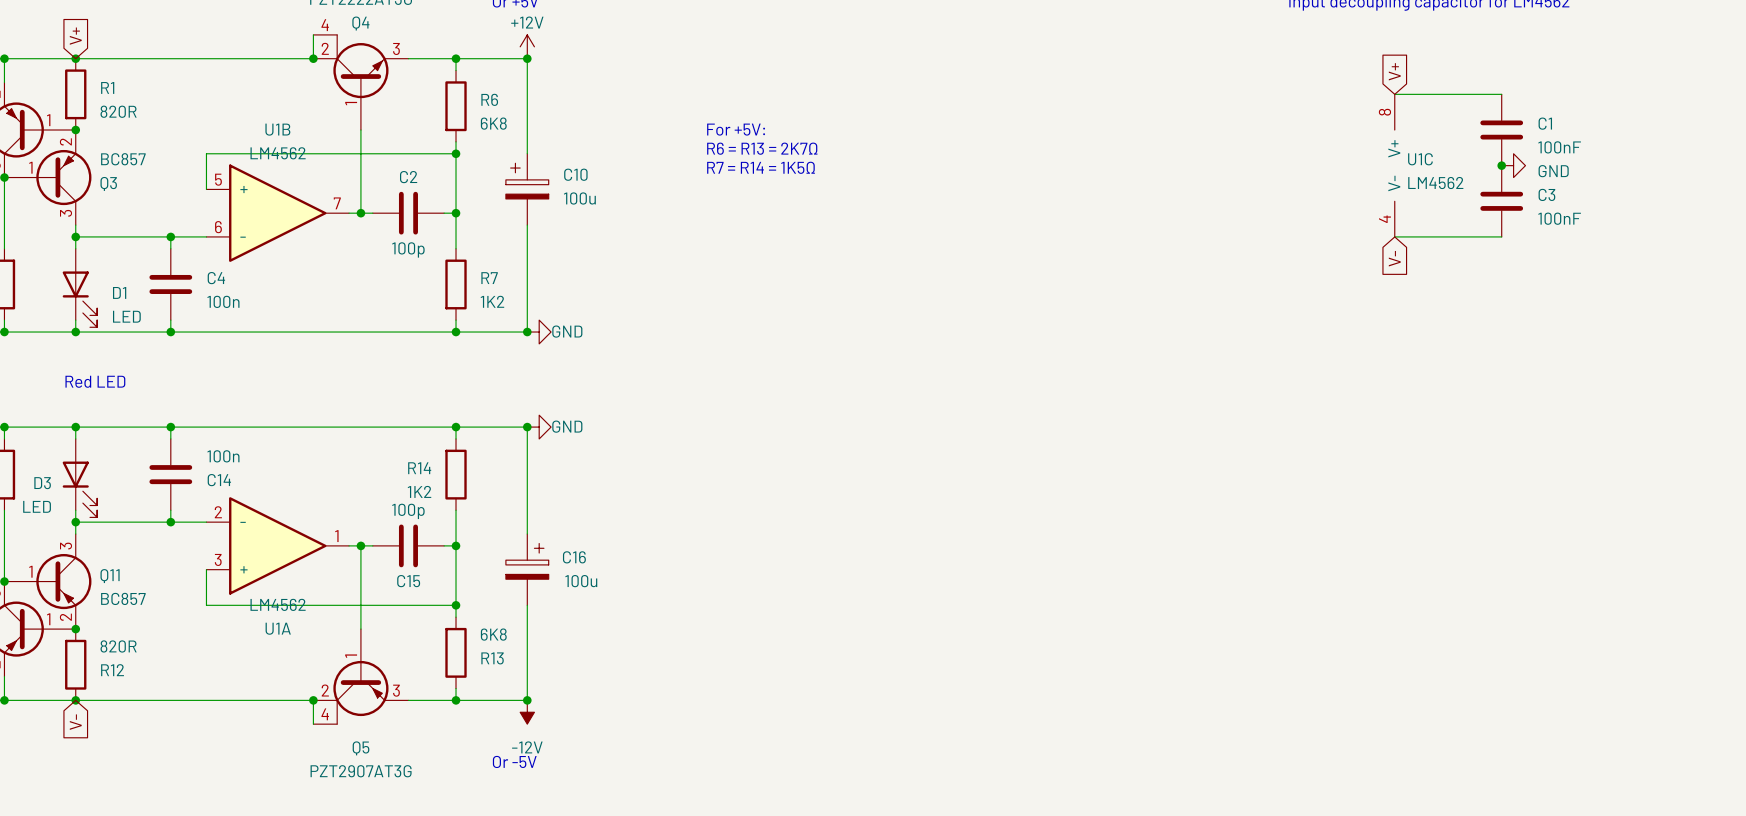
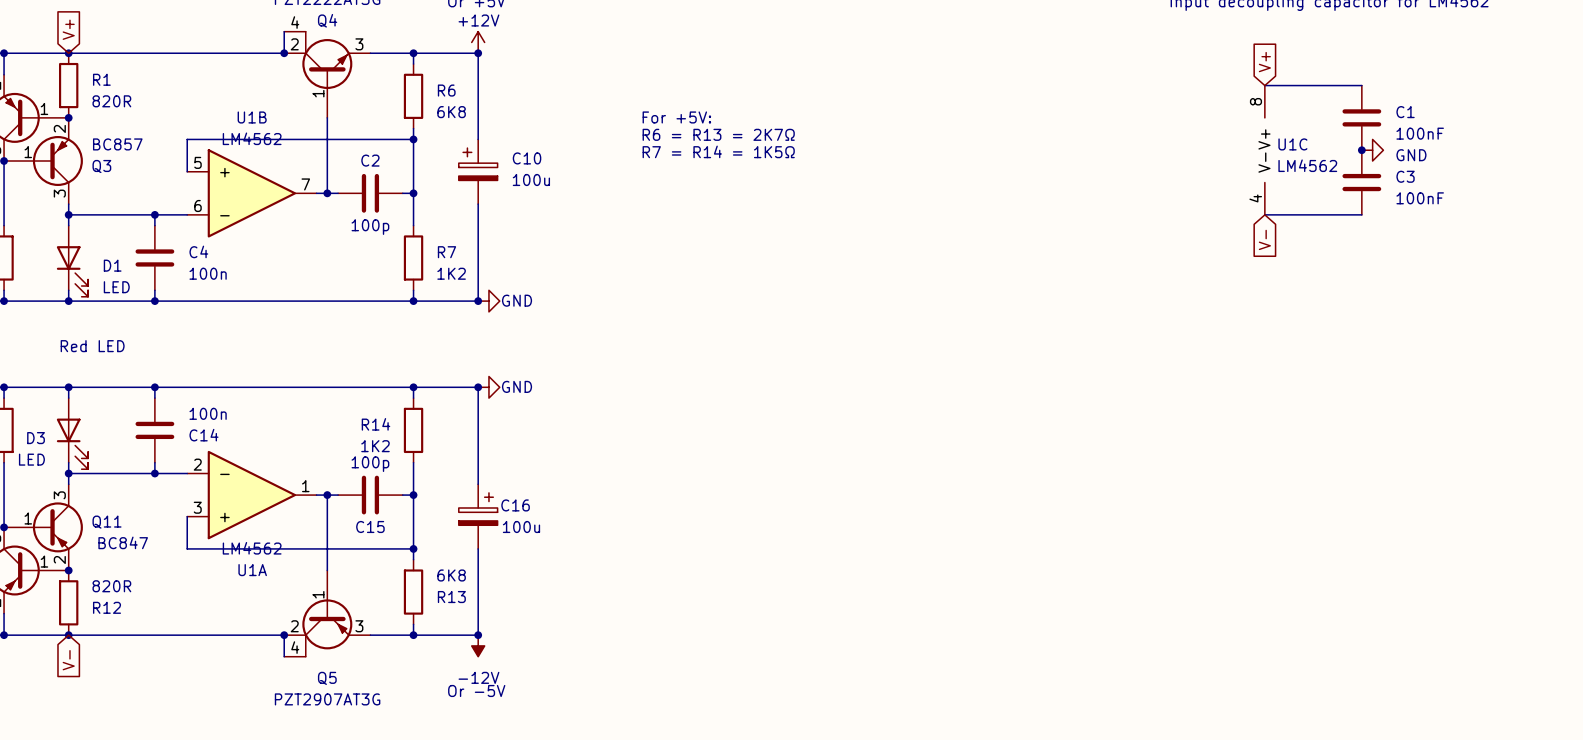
Q11 value: BC857 (123, 598) -> BC847 (123, 542)

